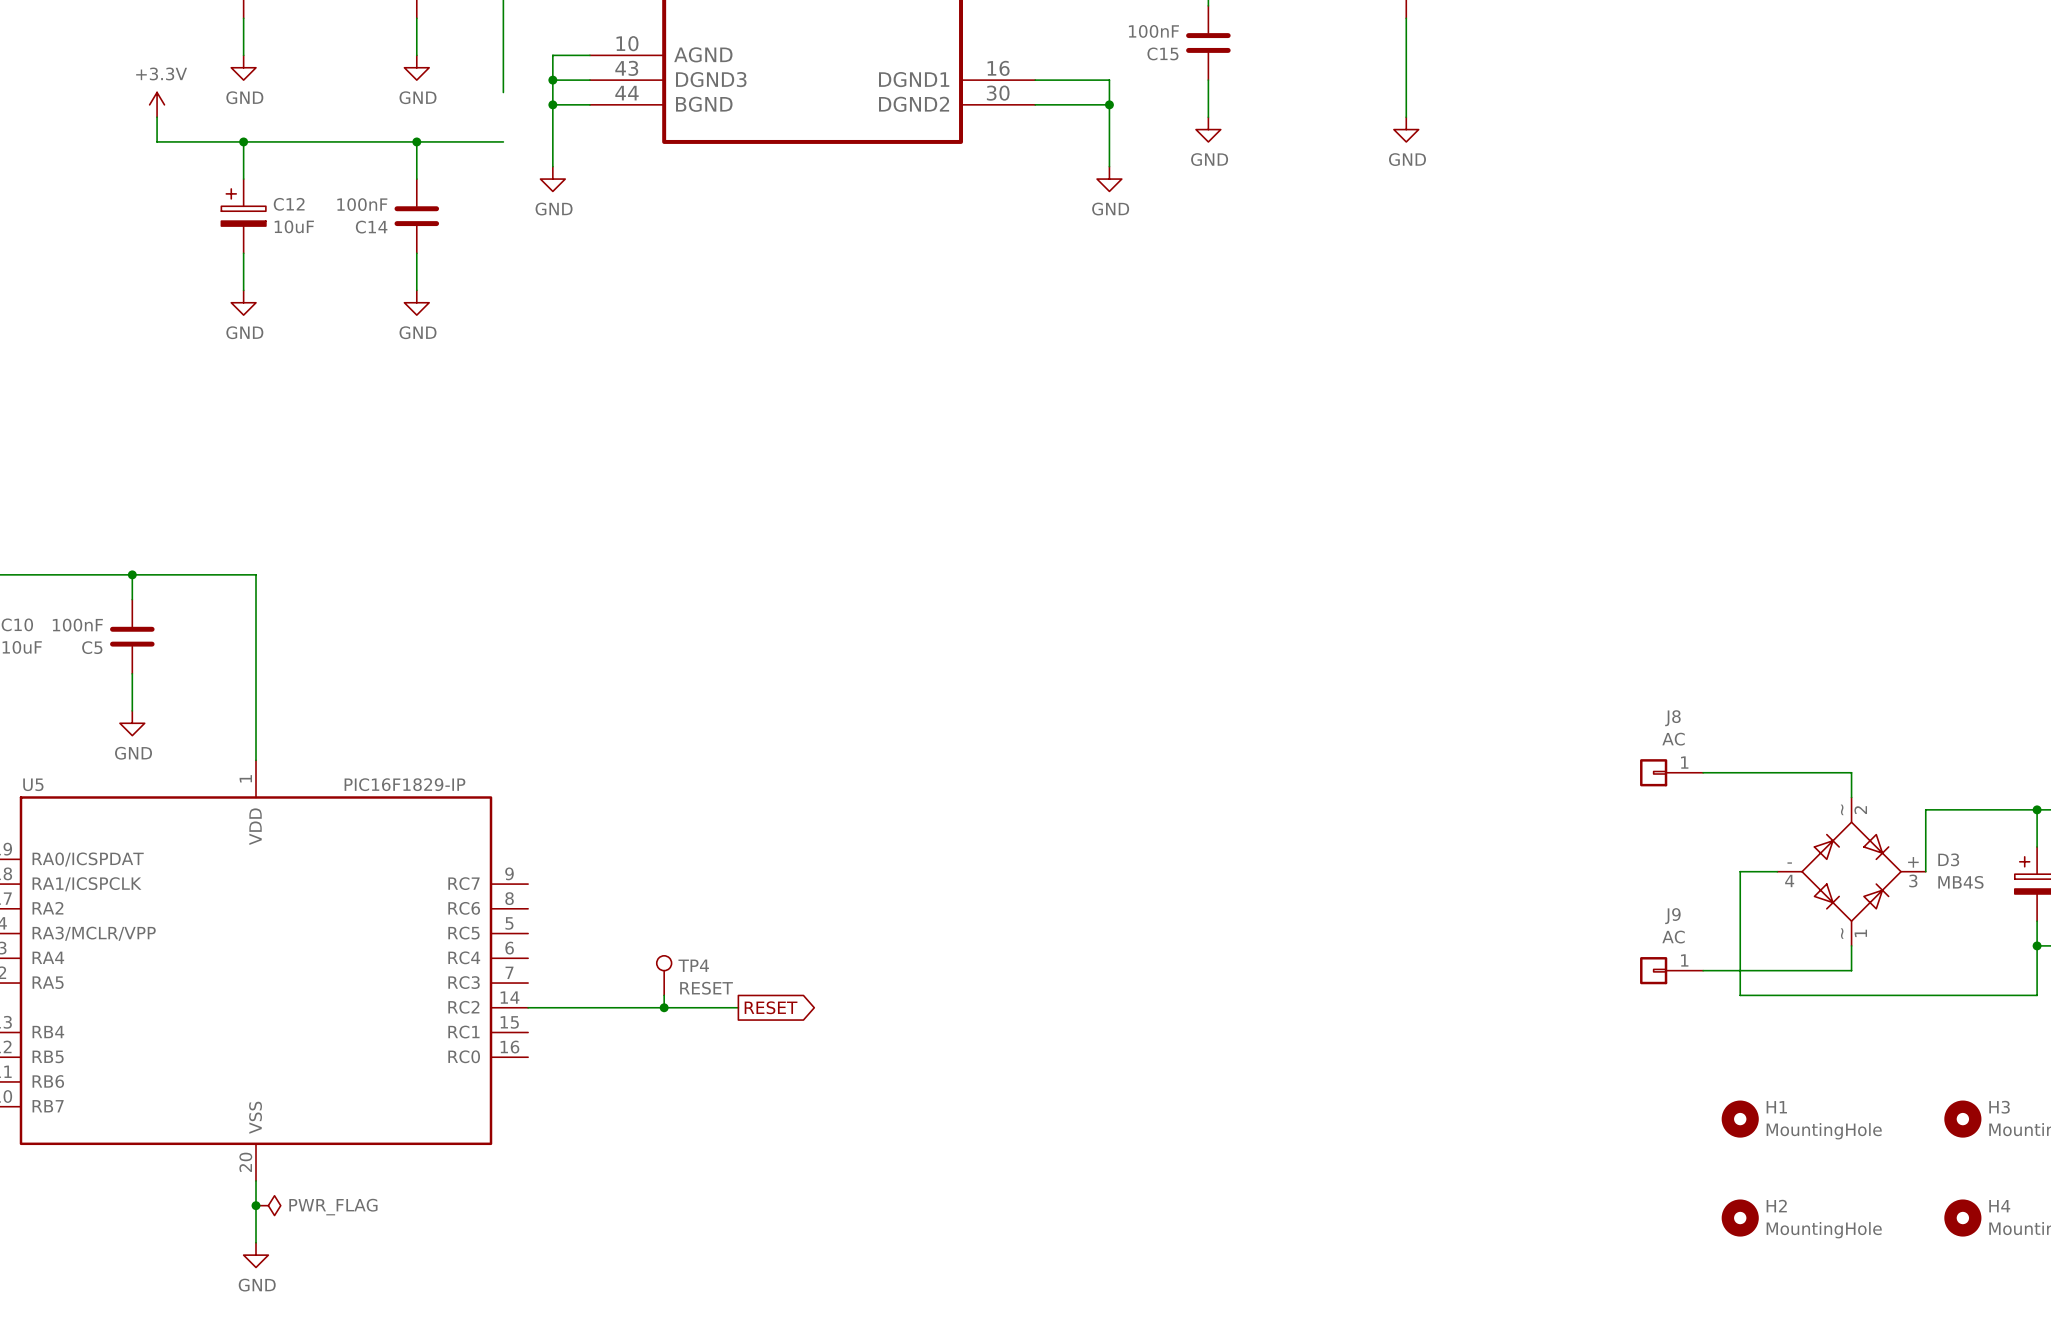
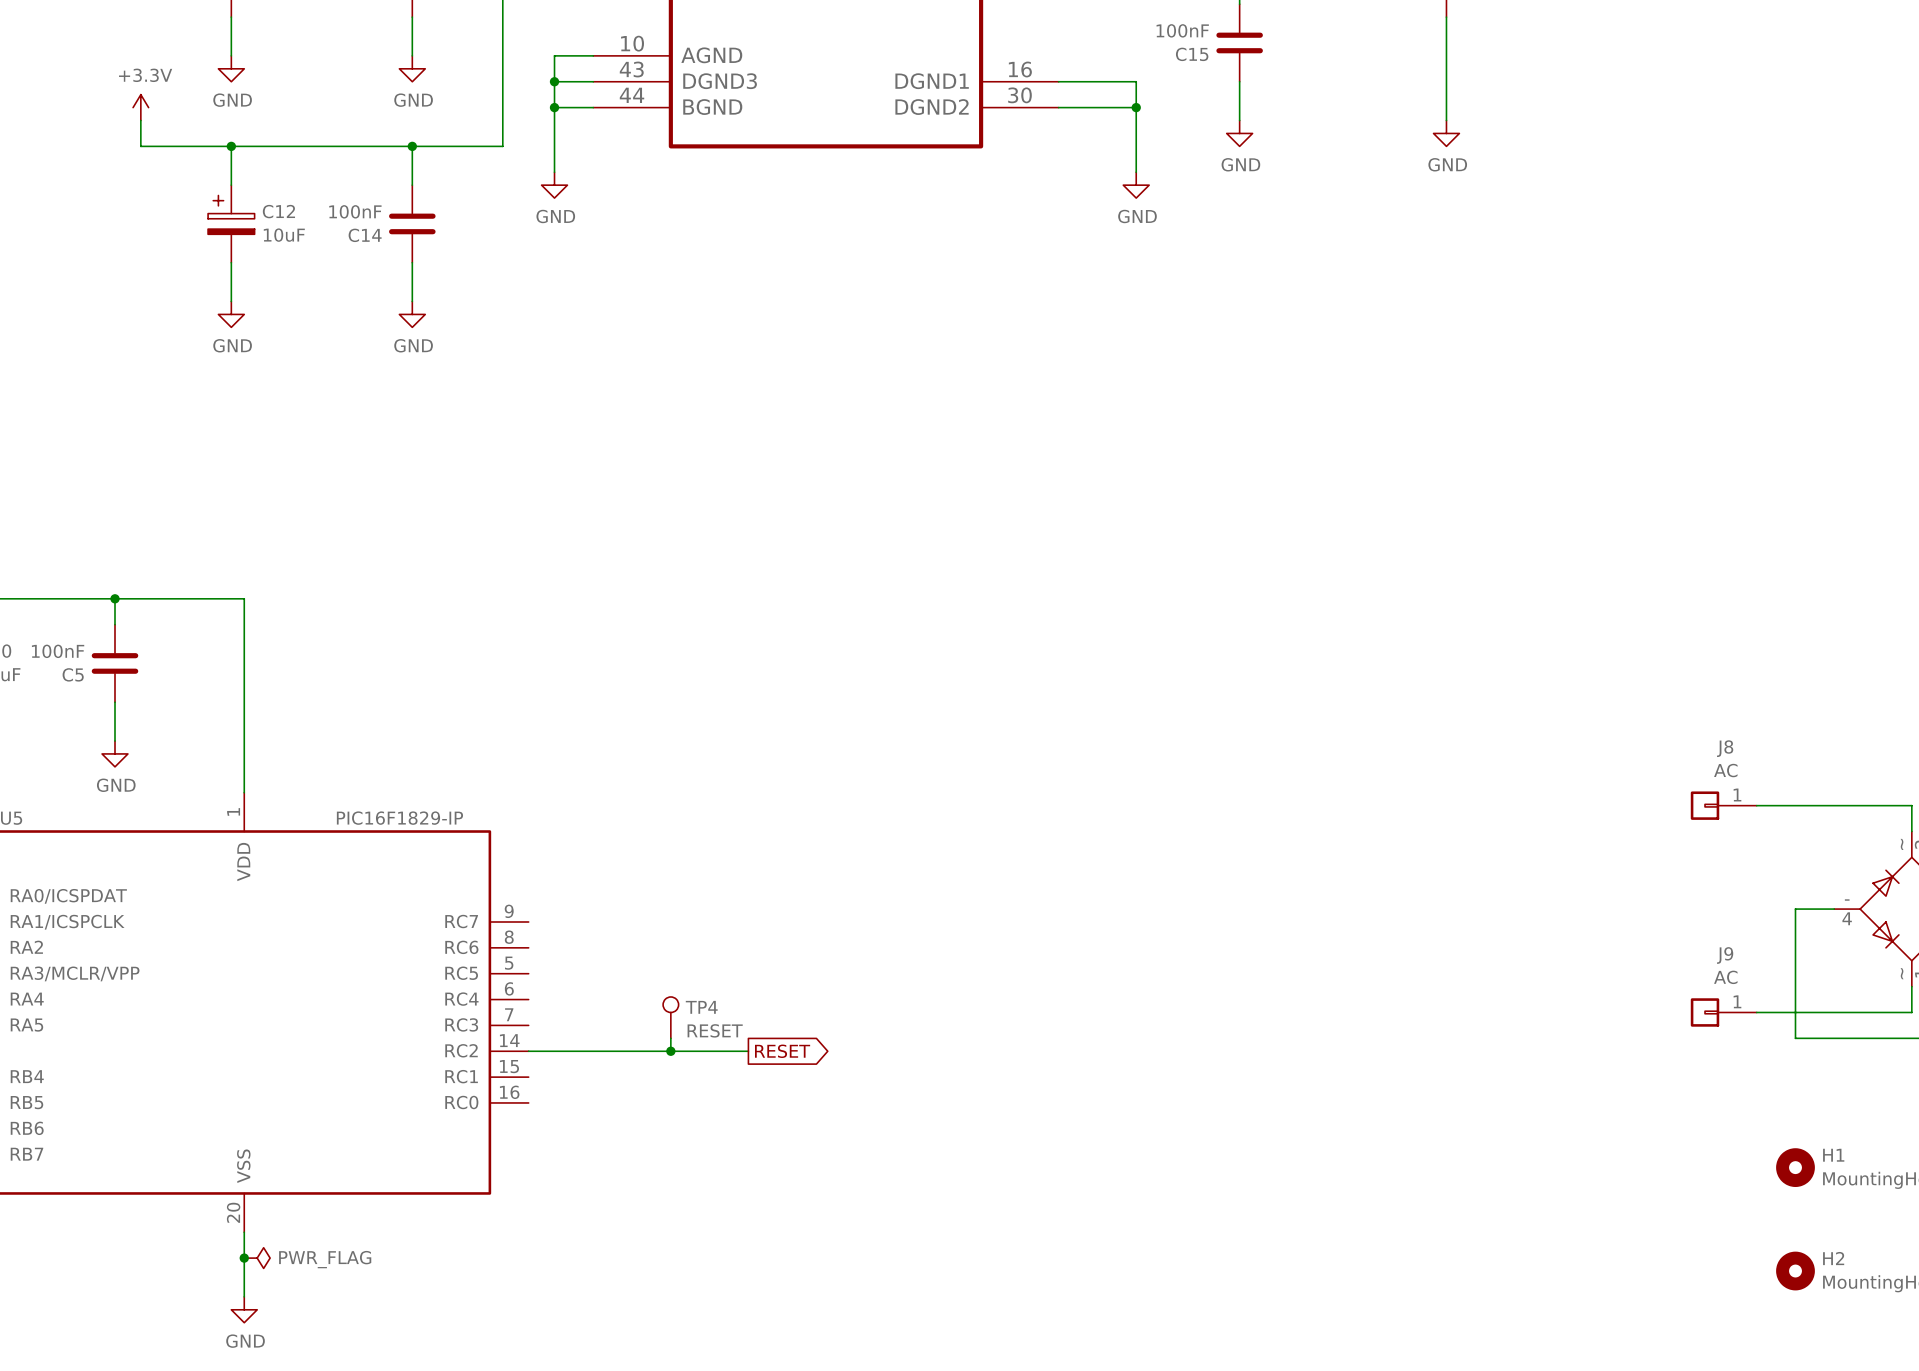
wire: none -> (502, 94) (502, 146)

